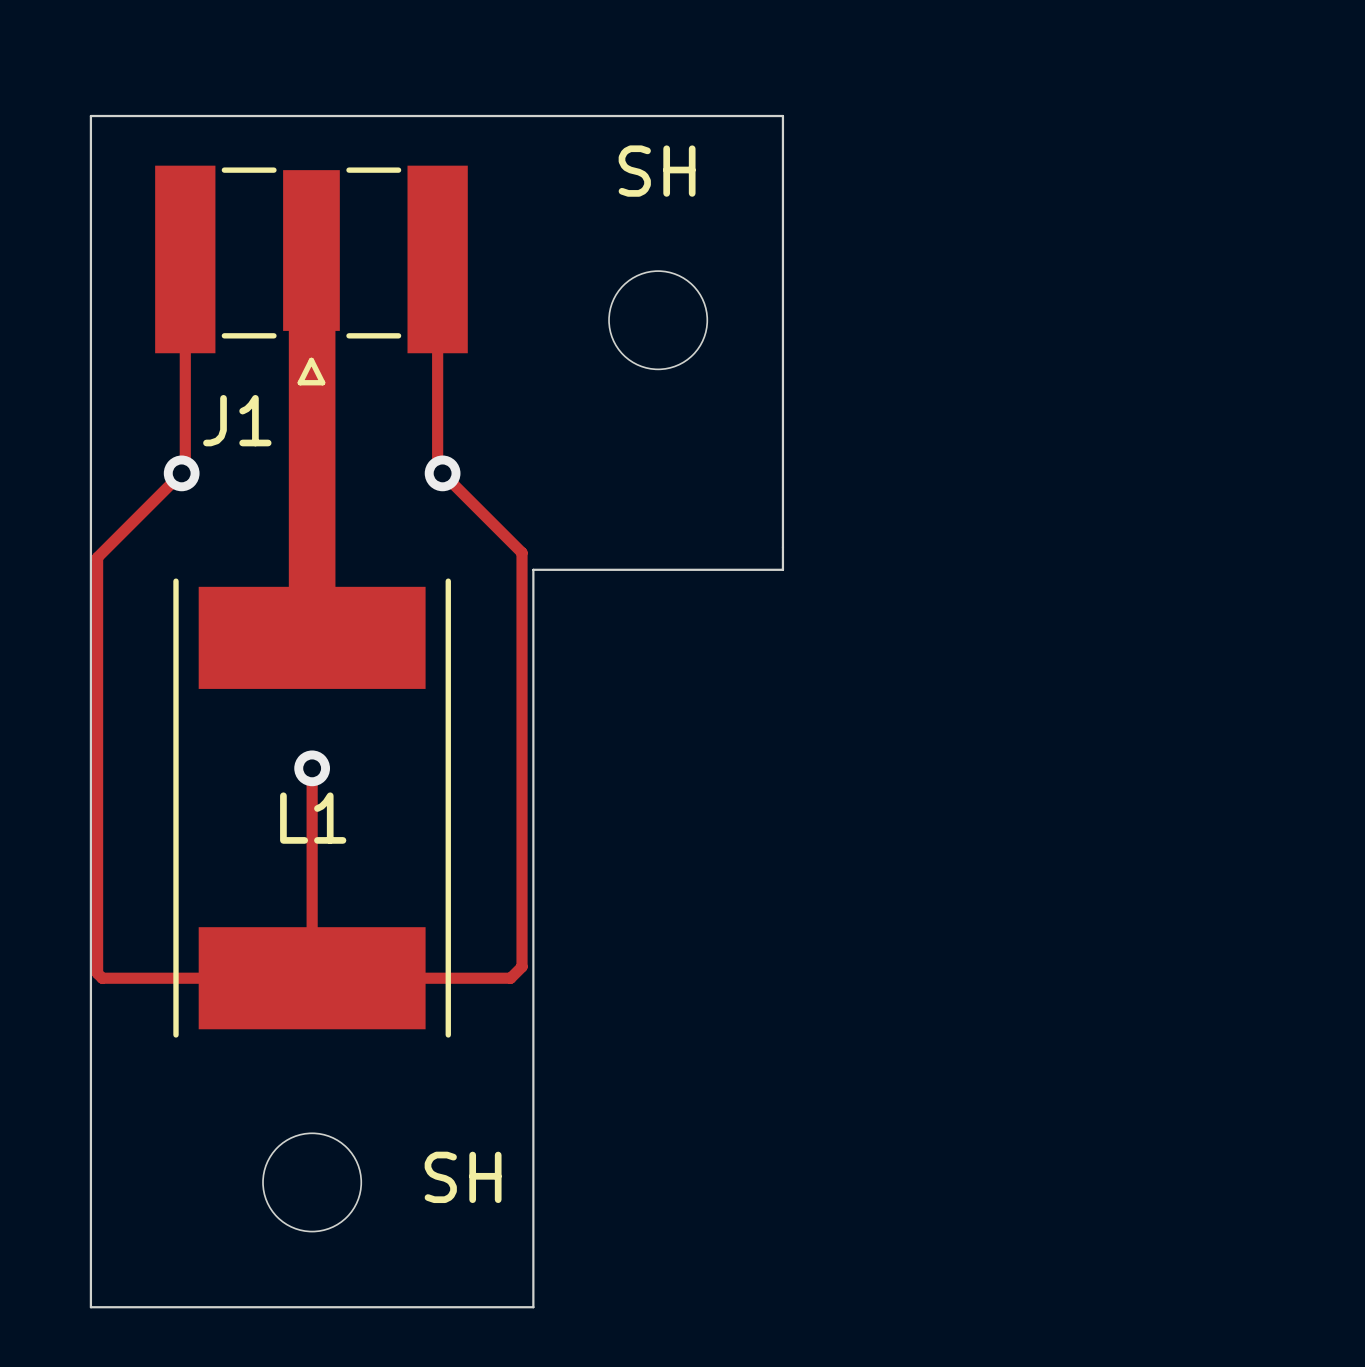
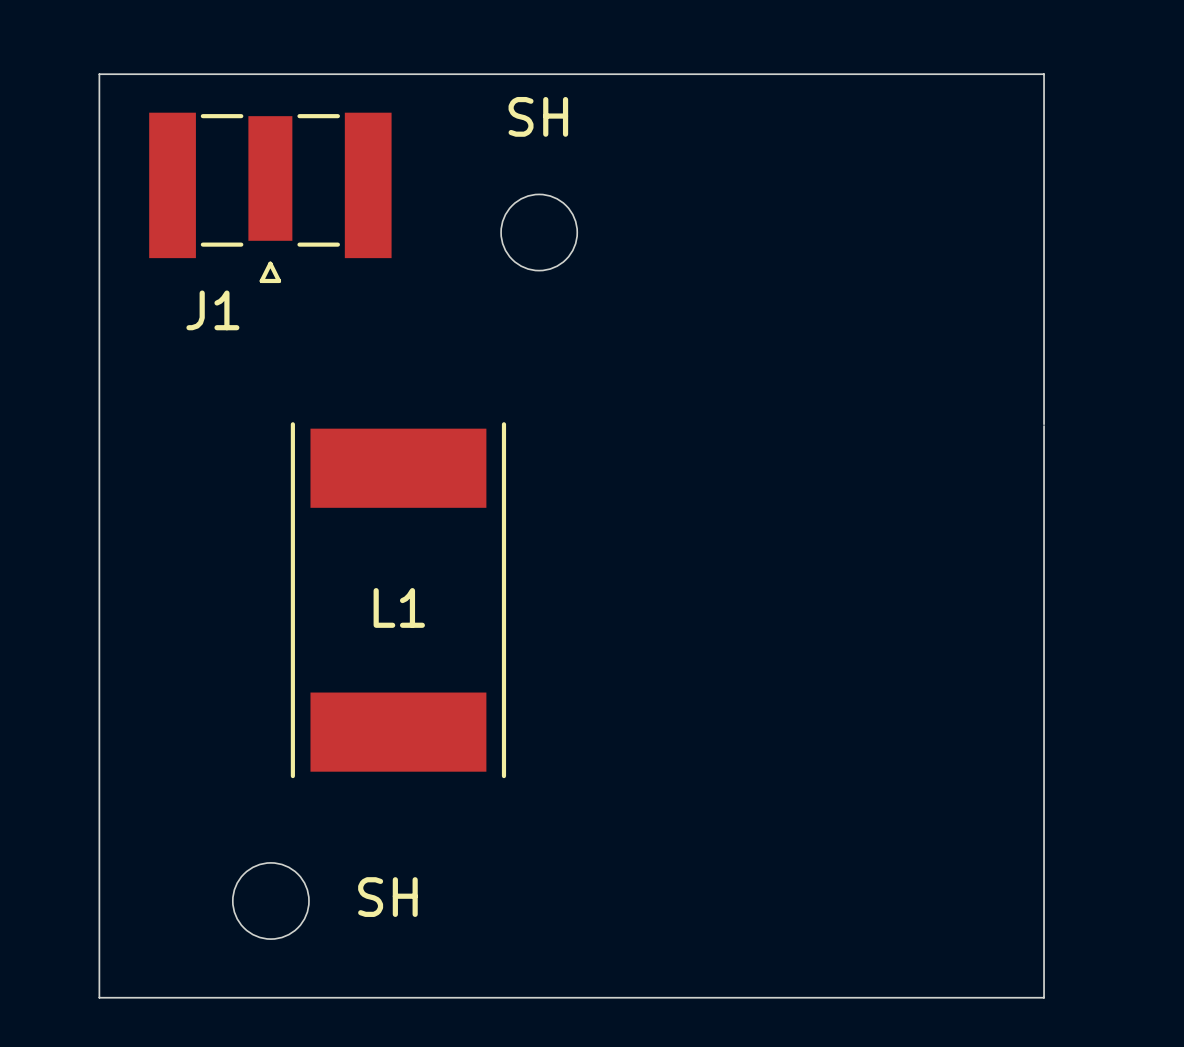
board edge: (782, 116) (782, 569) (533, 569) (533, 1307) -> (1044, 426) (1044, 997) (442, 997)
board edge: none -> (635, 74) (1044, 74) (1044, 424)
track: (185, 259) (185, 469) (97, 557) (97, 973) (102, 978) (510, 978) (522, 966) (522, 552) (437, 468) (437, 259) -> none
track: (312, 325) (312, 637) -> none
via: (181, 473) -> none
via: (442, 473) -> none
track: (312, 768) (312, 978) -> none
via: (312, 768) -> none
L1 position: (312, 808) -> (398, 600)

